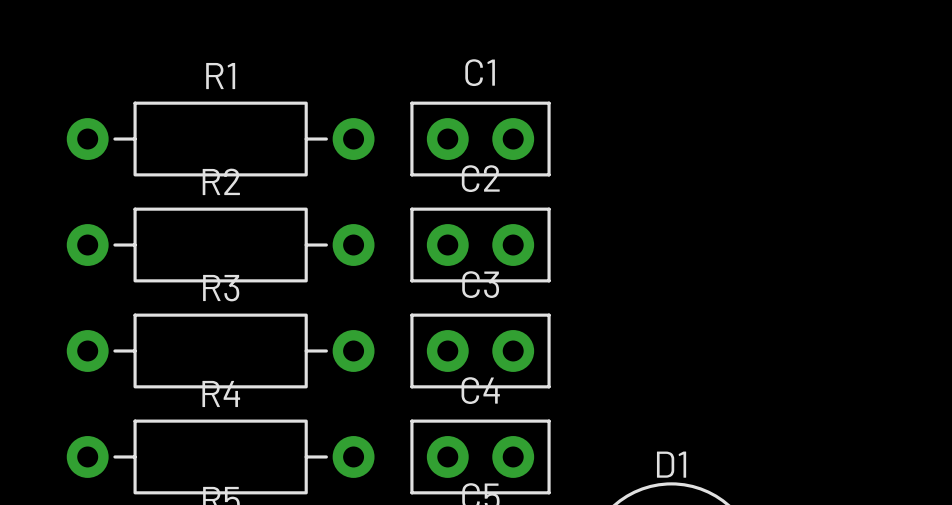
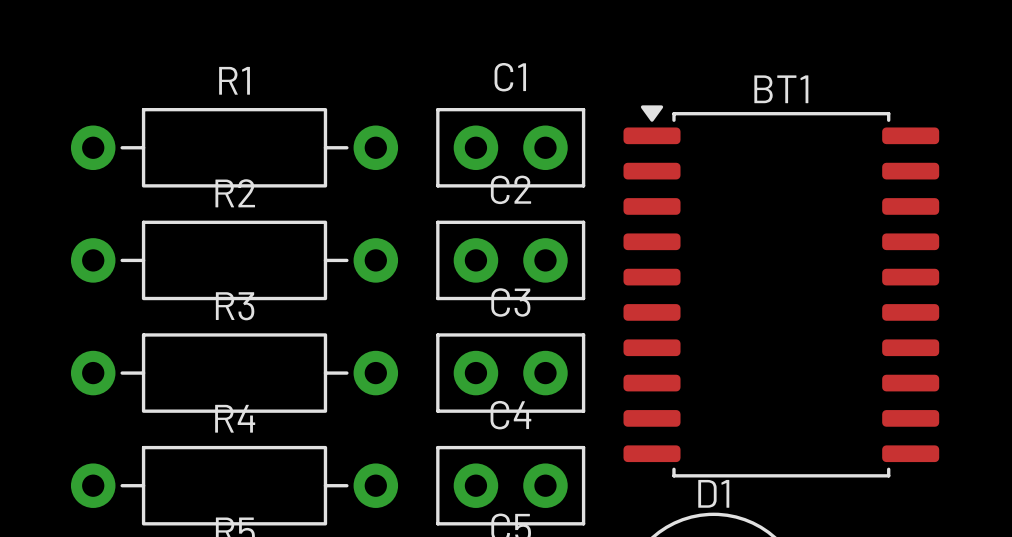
BT1: none -> (781, 291)

